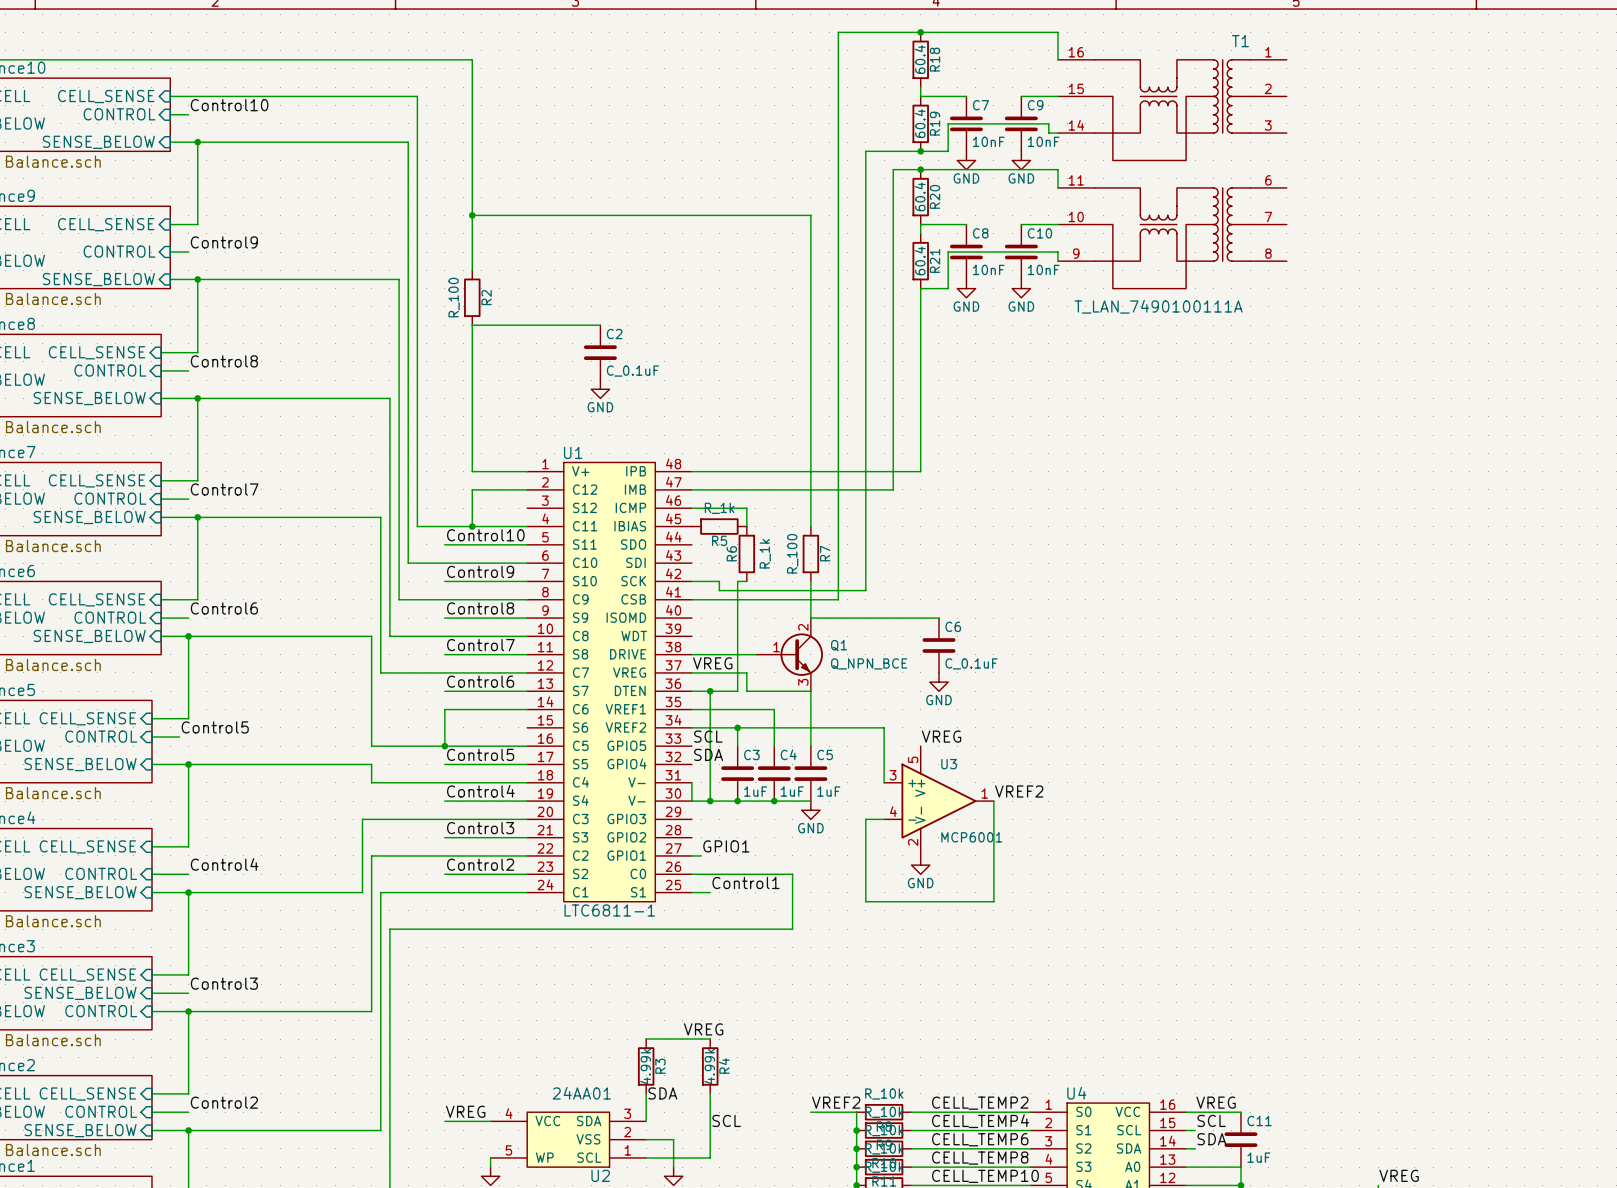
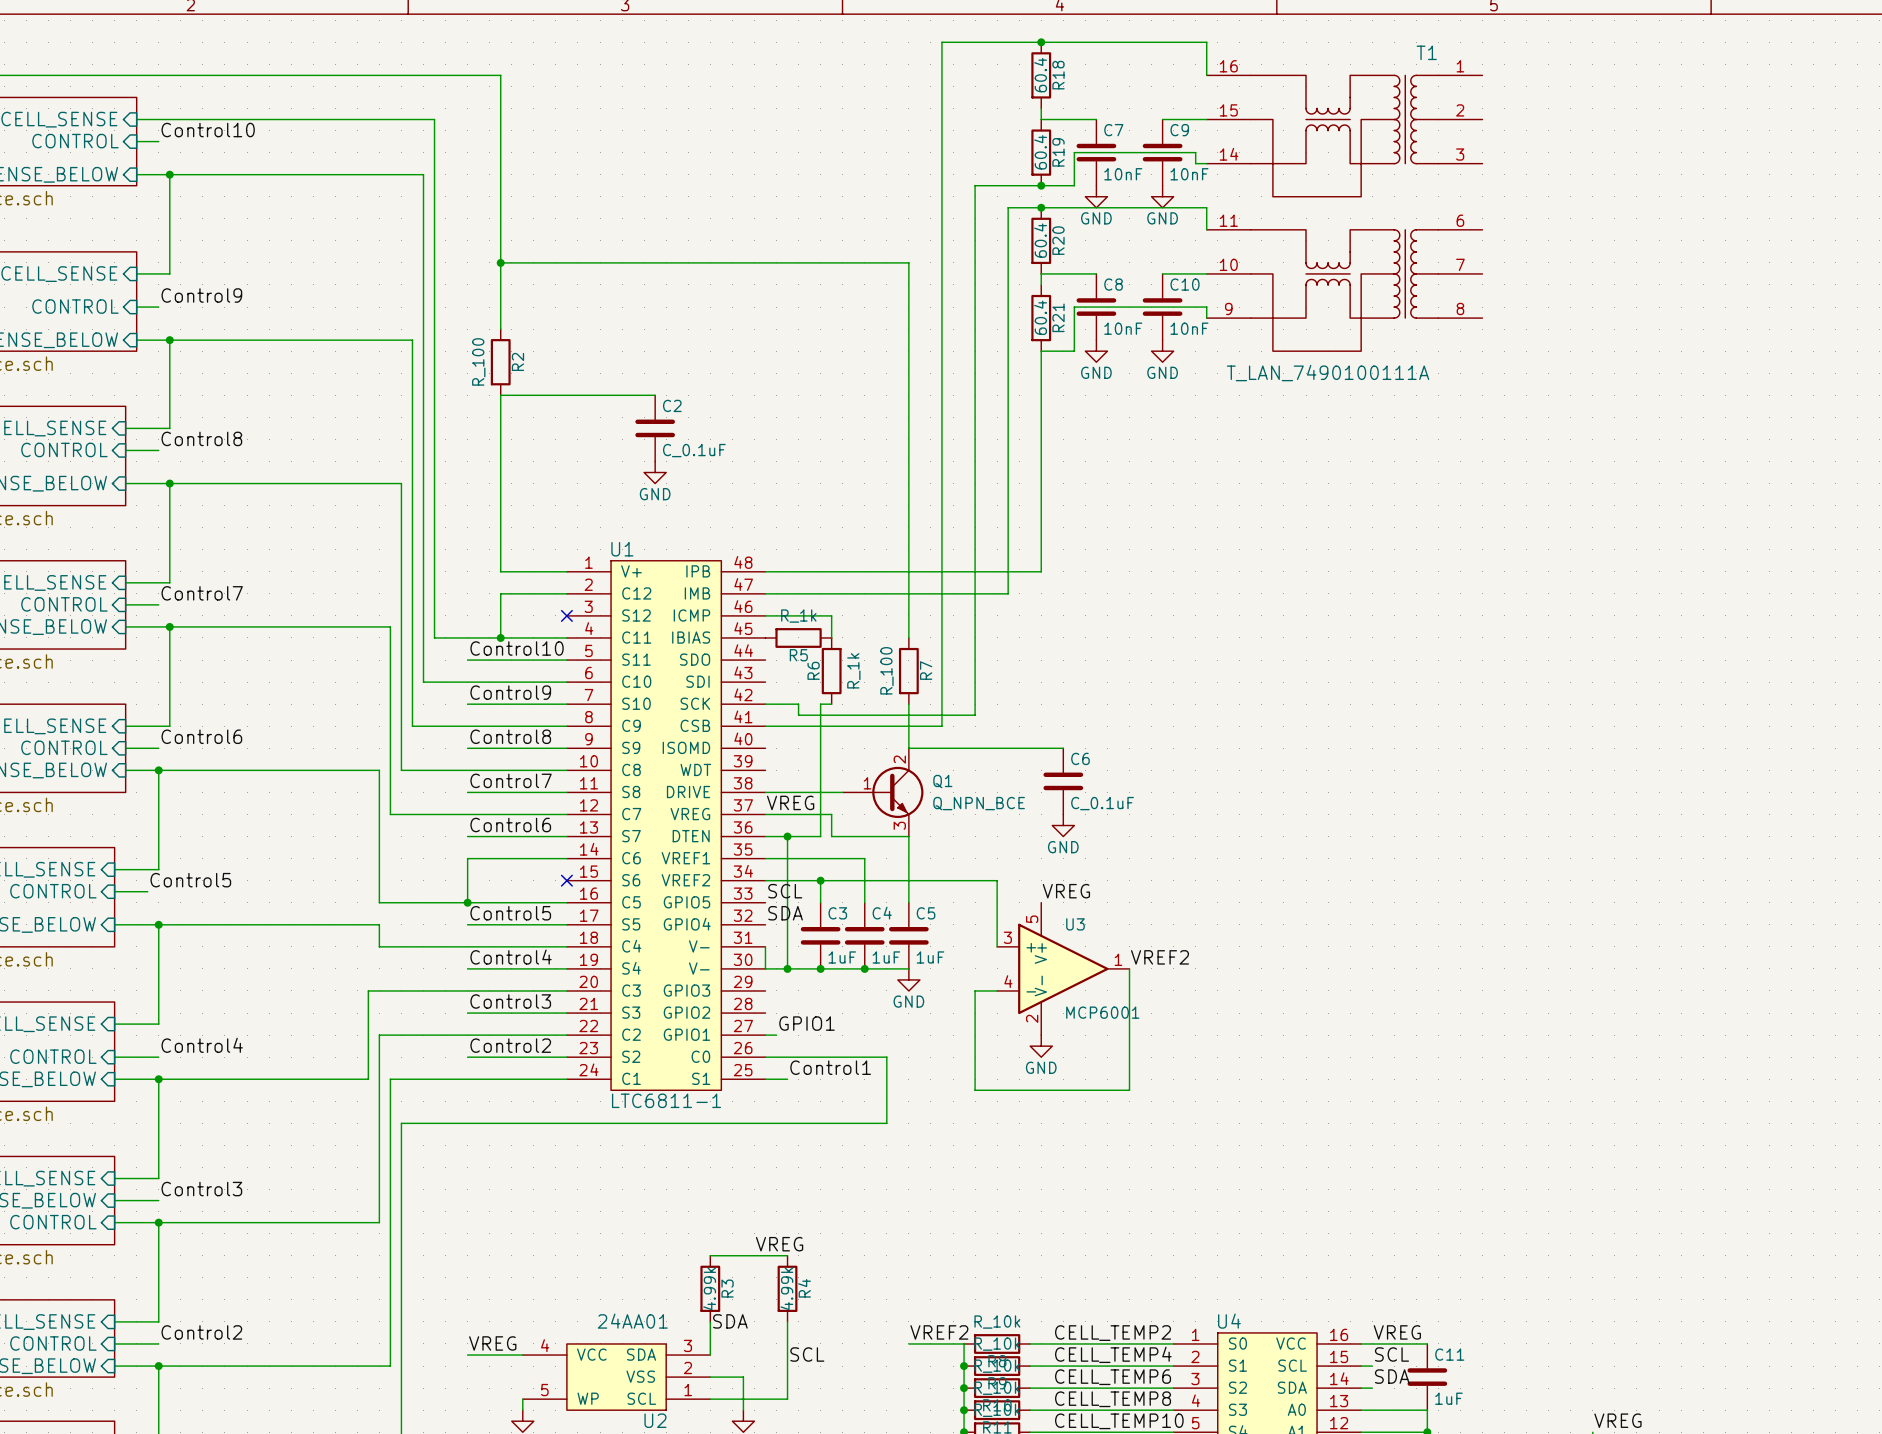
no-connect mark: none -> (566, 615)
no-connect mark: none -> (566, 880)

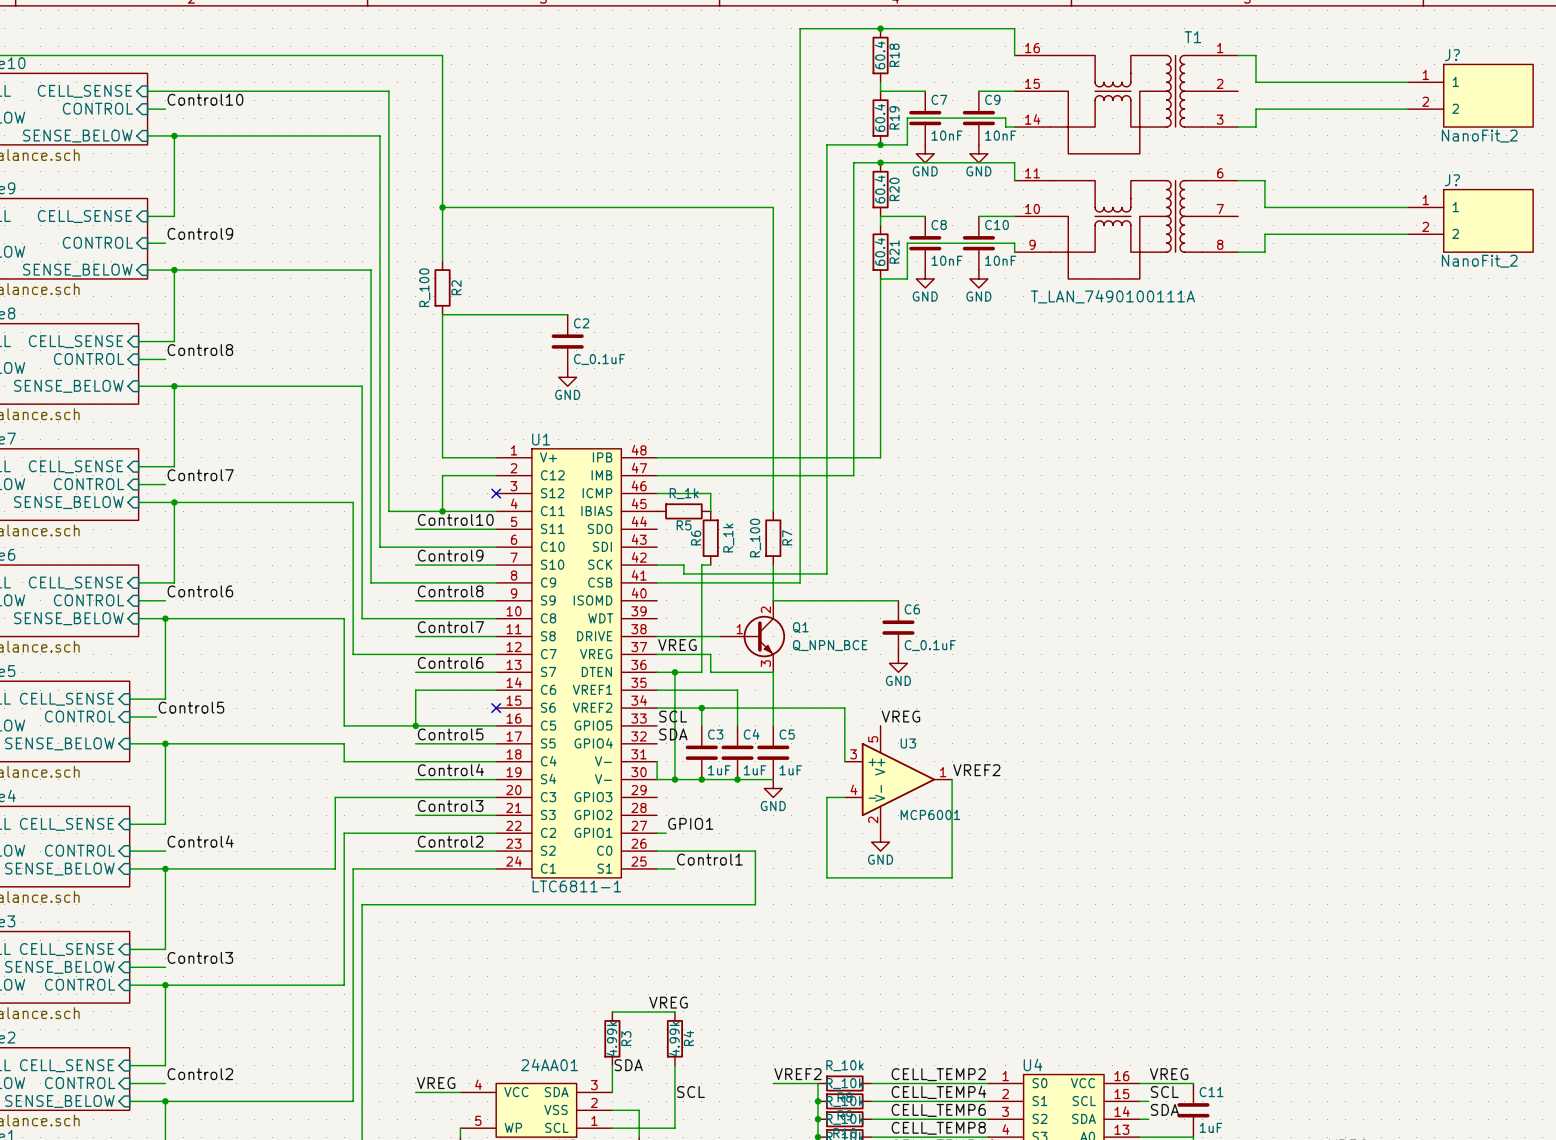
wire: none -> (1238, 55) (1256, 55) (1256, 82) (1407, 82)
J?: none -> NanoFit_2 (1470, 95)
wire: none -> (1407, 109) (1256, 109) (1256, 127) (1238, 127)
wire: none -> (1238, 180) (1264, 180) (1264, 207) (1407, 207)
J?: none -> NanoFit_2 (1470, 220)
wire: none -> (1407, 234) (1264, 234) (1264, 252) (1238, 252)

